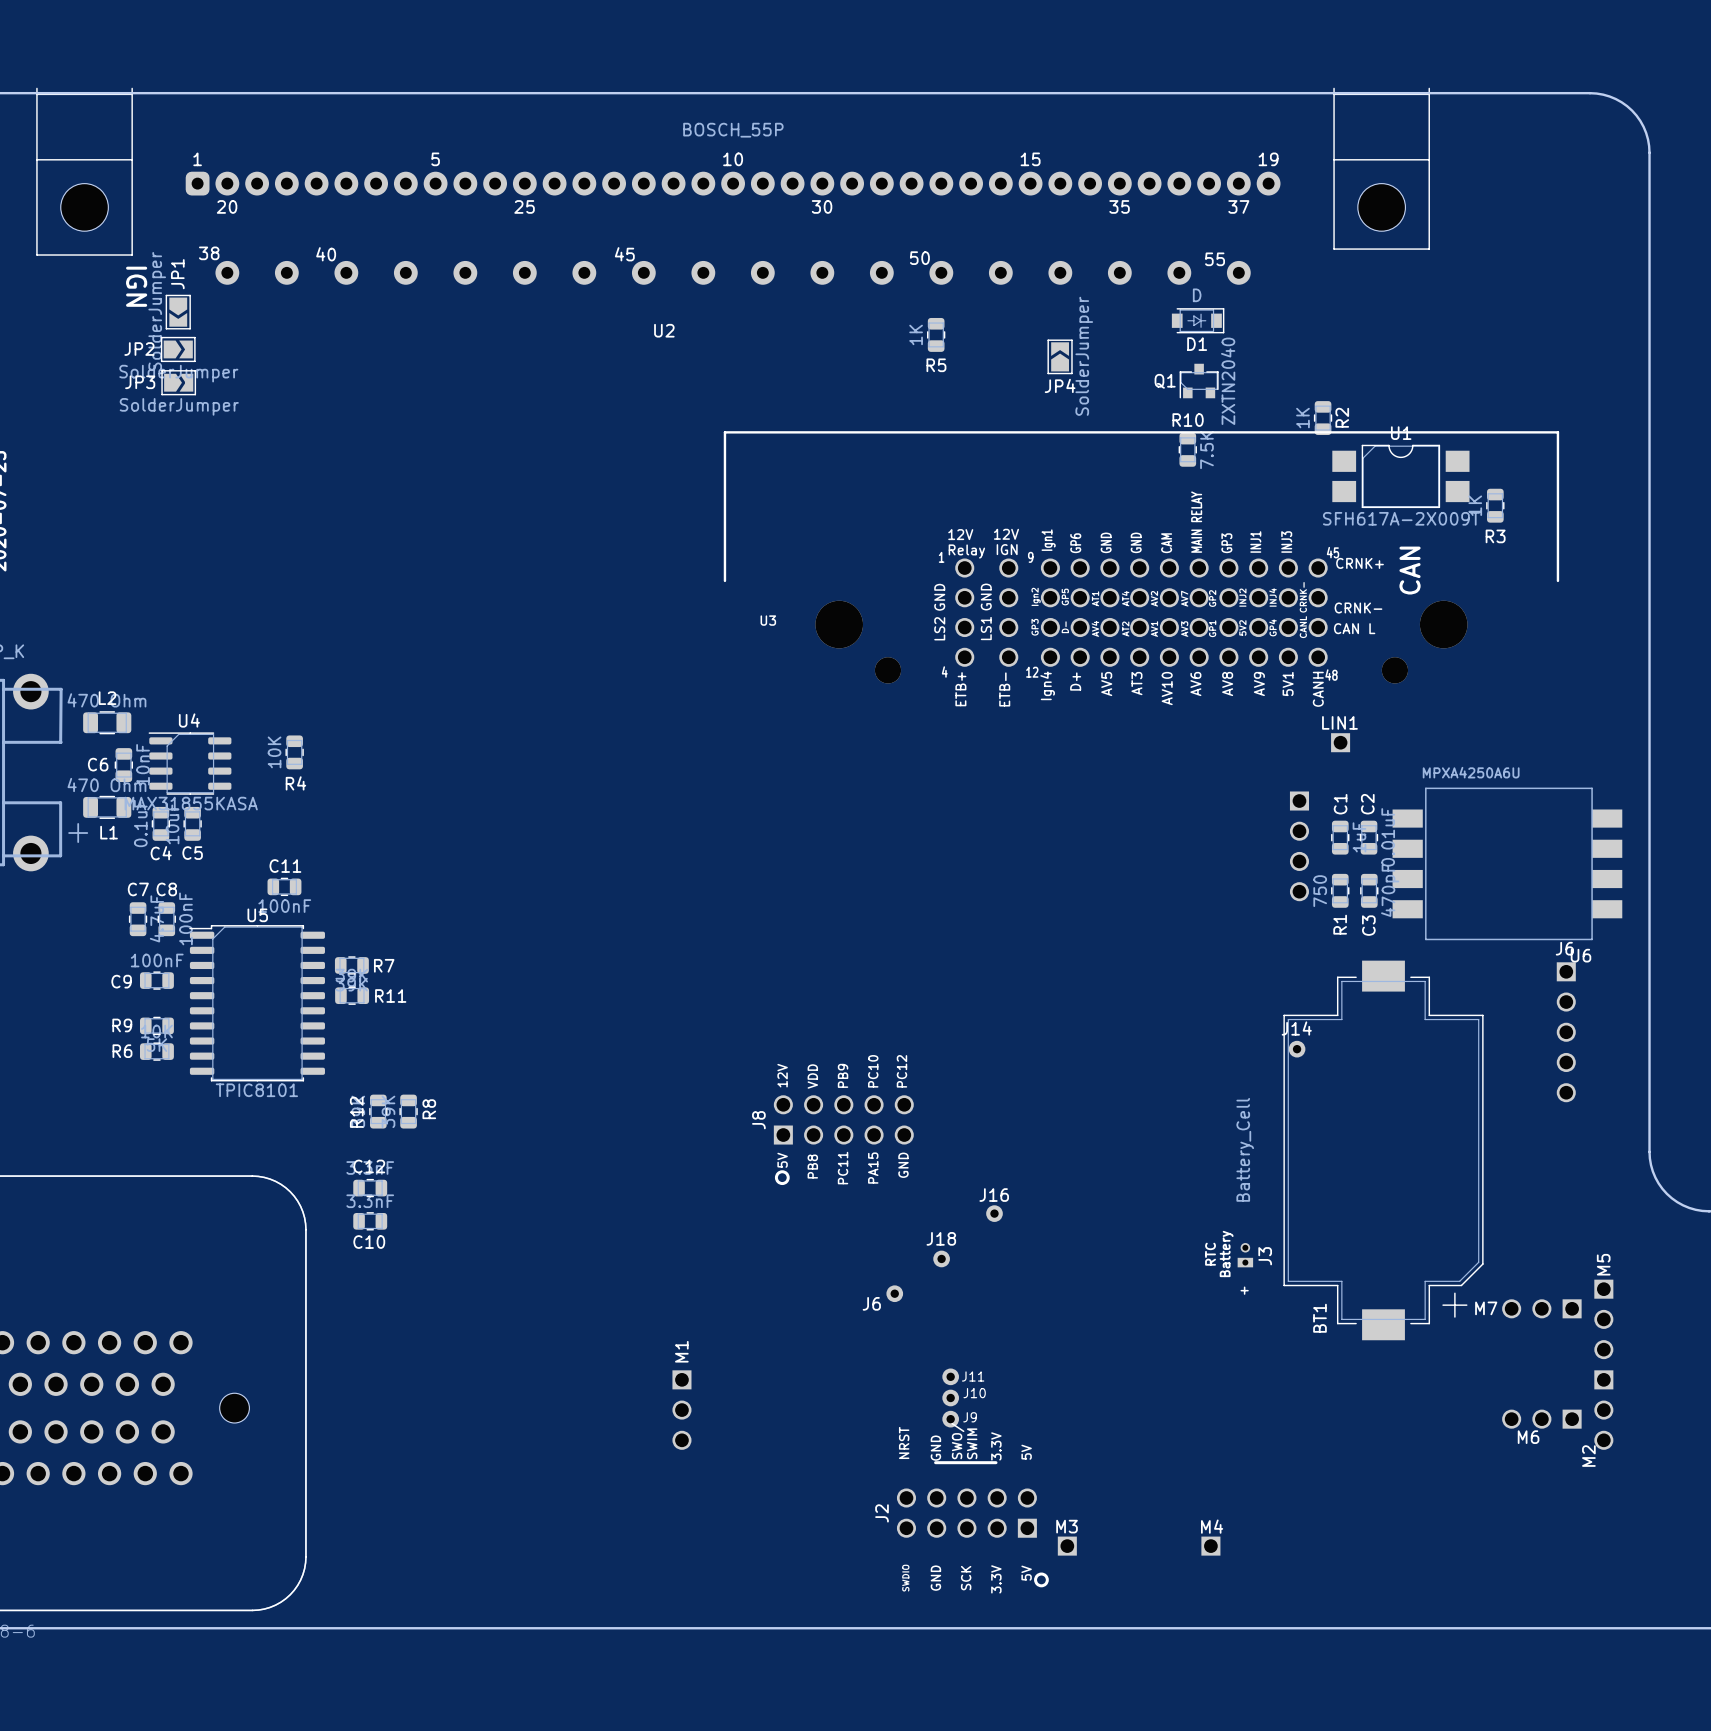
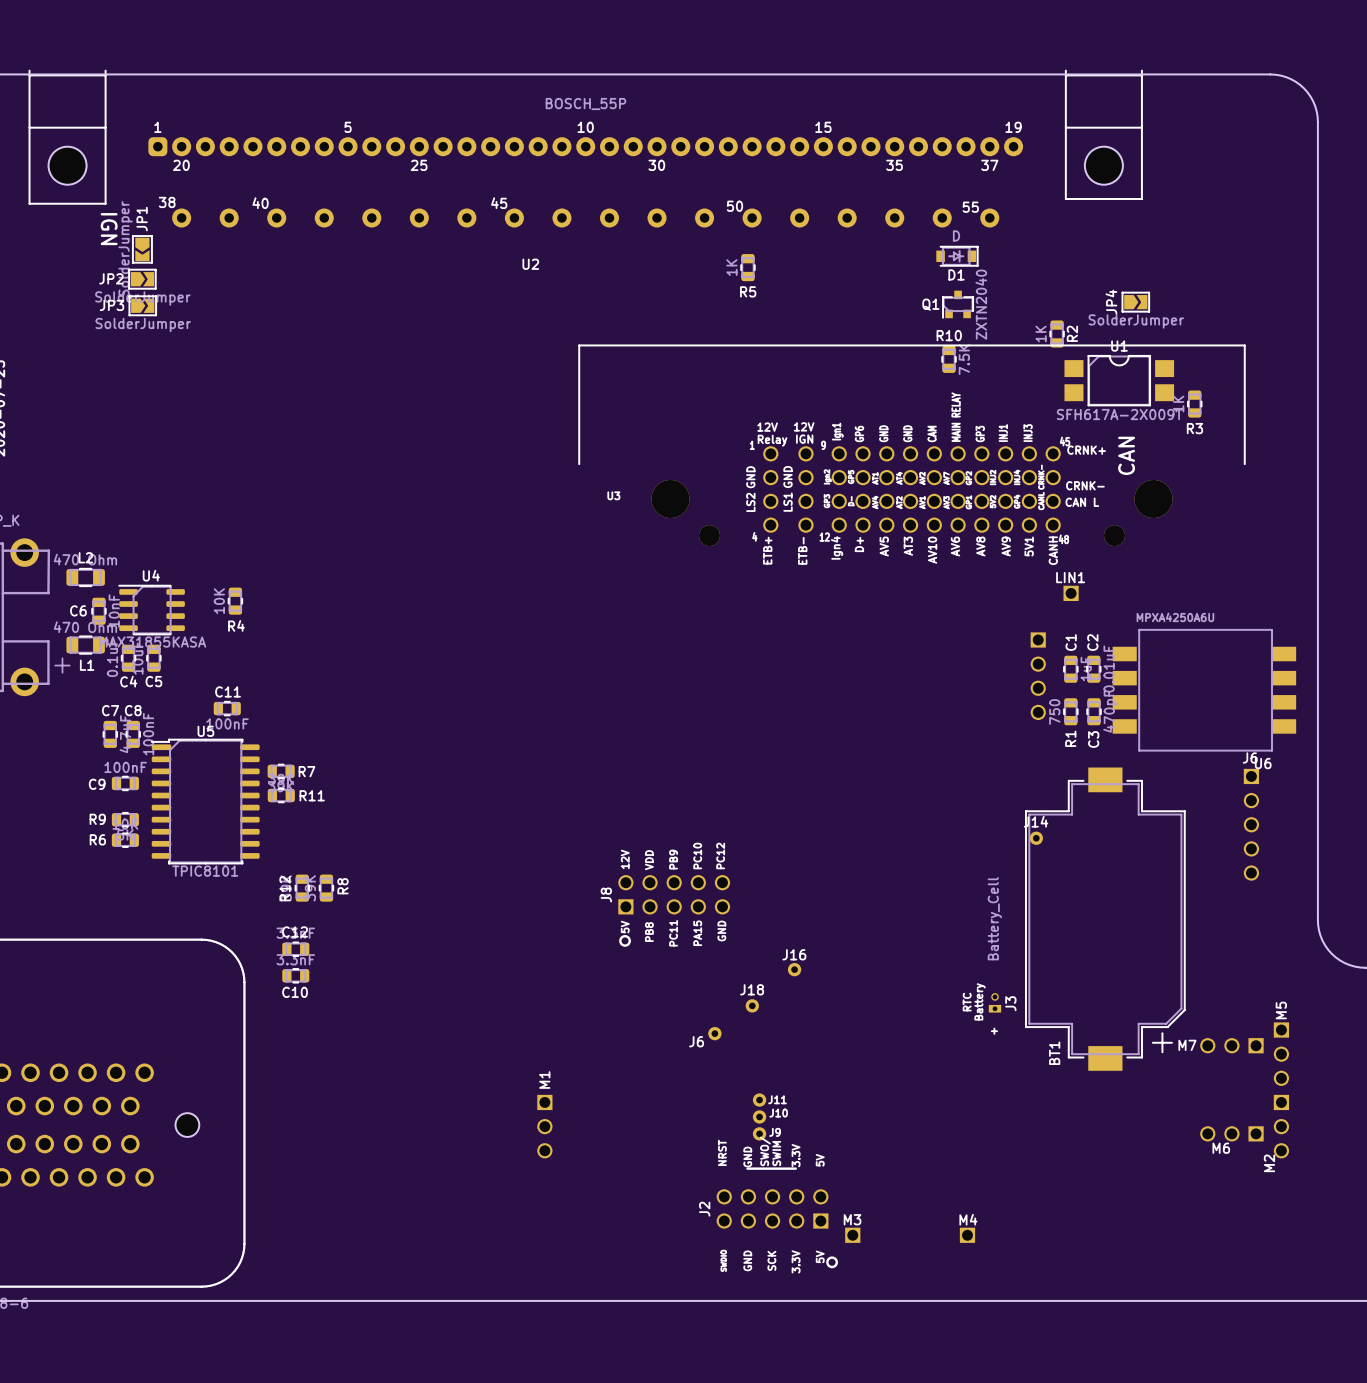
JP4 rotation: 0° (1060, 356) -> 90° clockwise (1135, 302)
JP4 position: (1060, 356) -> (1135, 302)

